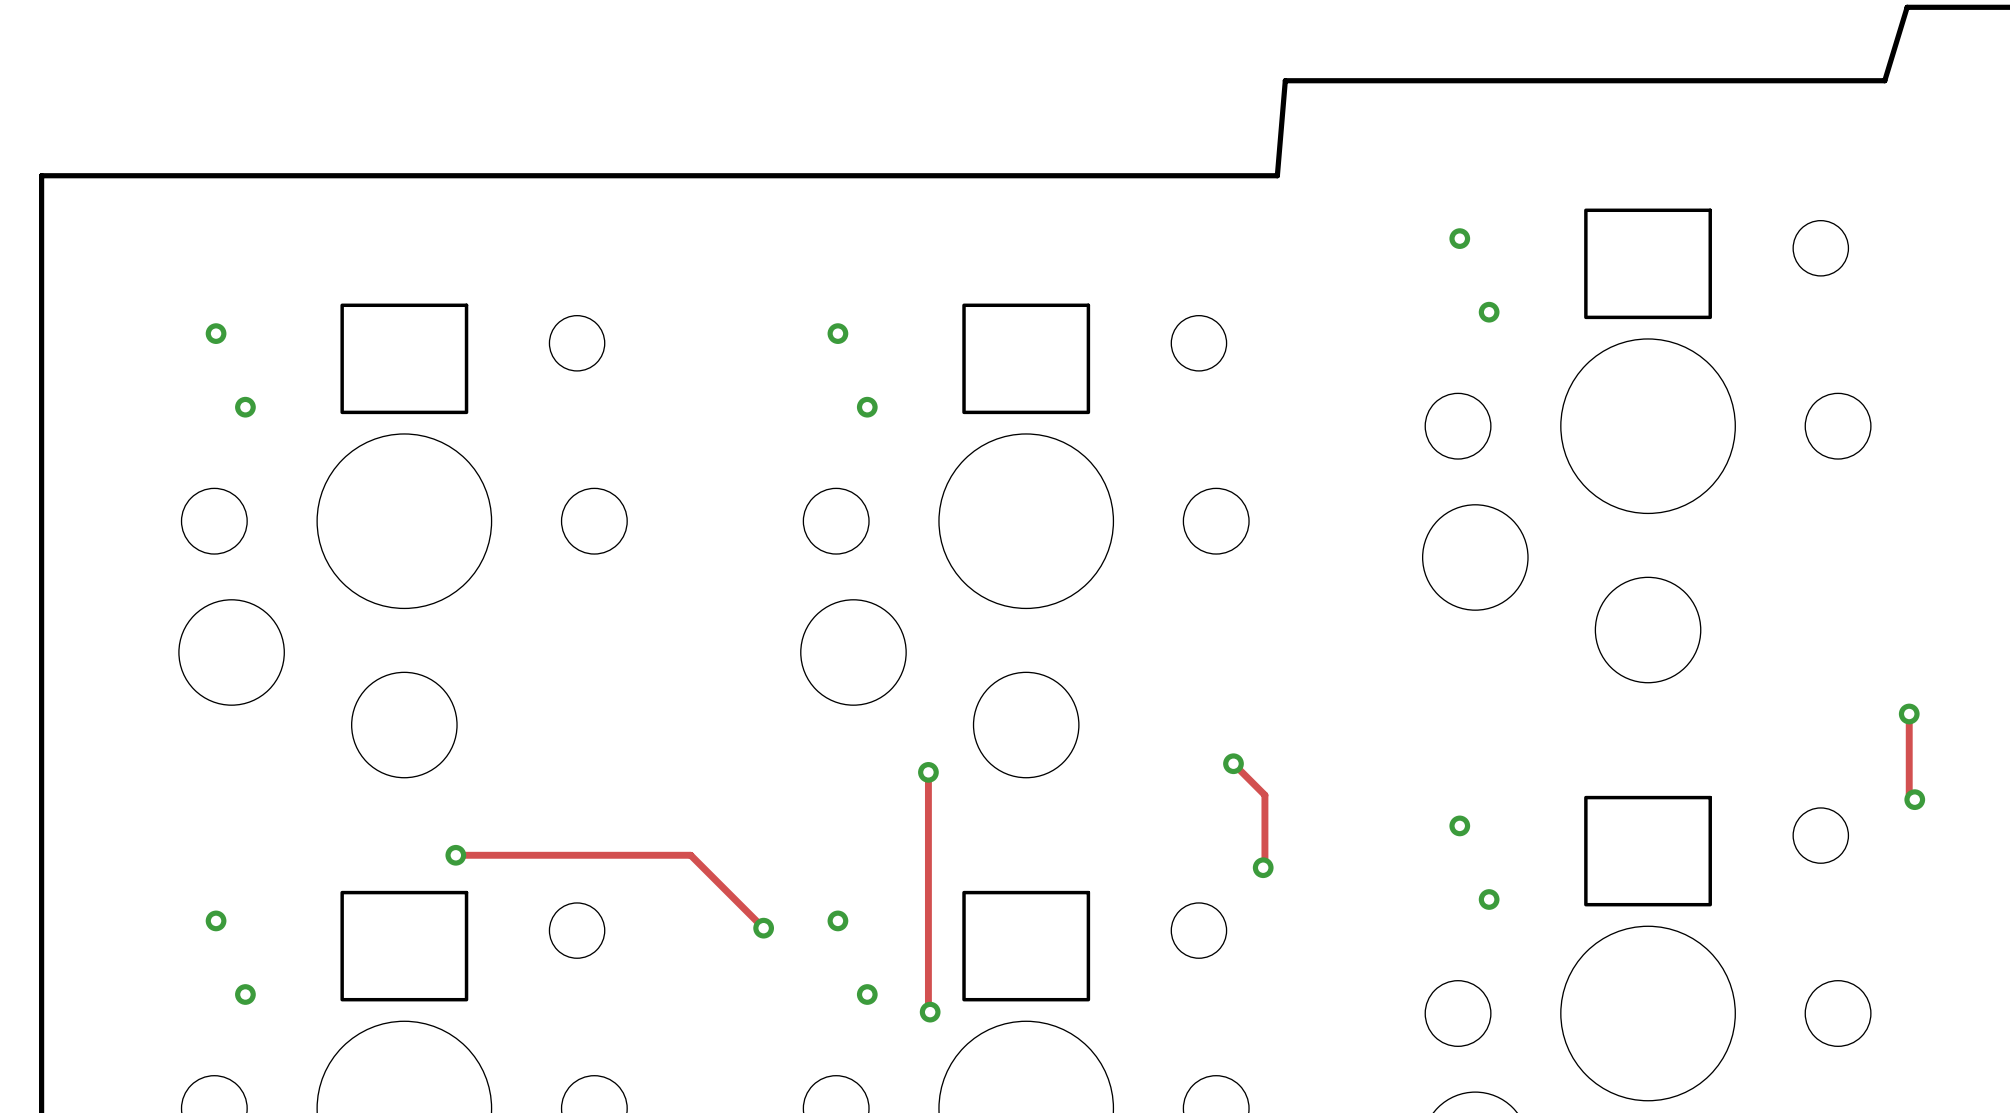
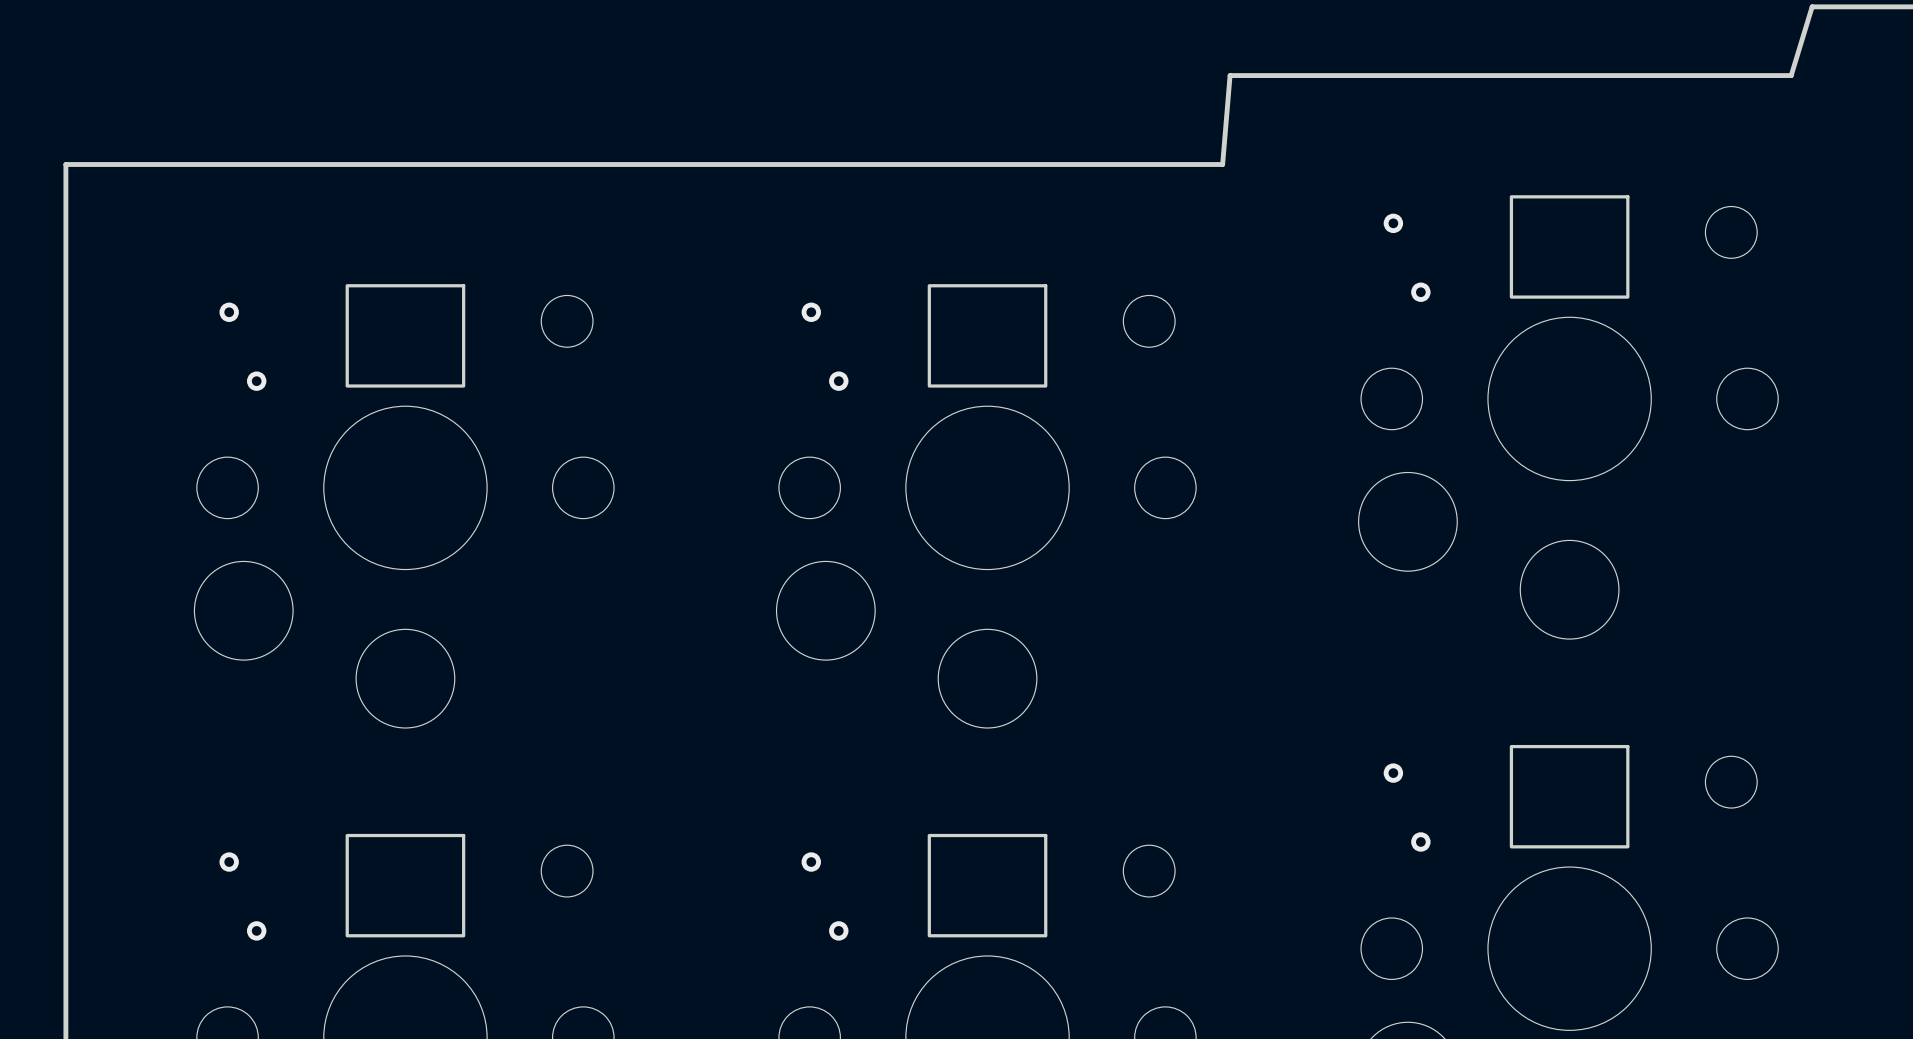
track: (1909, 713) (1909, 794) (1914, 799) -> none
via: (1909, 713) -> none
track: (1233, 763) (1264, 795) (1264, 865) (1263, 867) -> none
via: (1233, 763) -> none
track: (928, 772) (928, 1010) (930, 1012) -> none
via: (928, 772) -> none
via: (1914, 799) -> none
track: (455, 855) (690, 855) (763, 928) -> none
via: (455, 855) -> none
via: (1263, 867) -> none
via: (763, 928) -> none
via: (930, 1012) -> none

